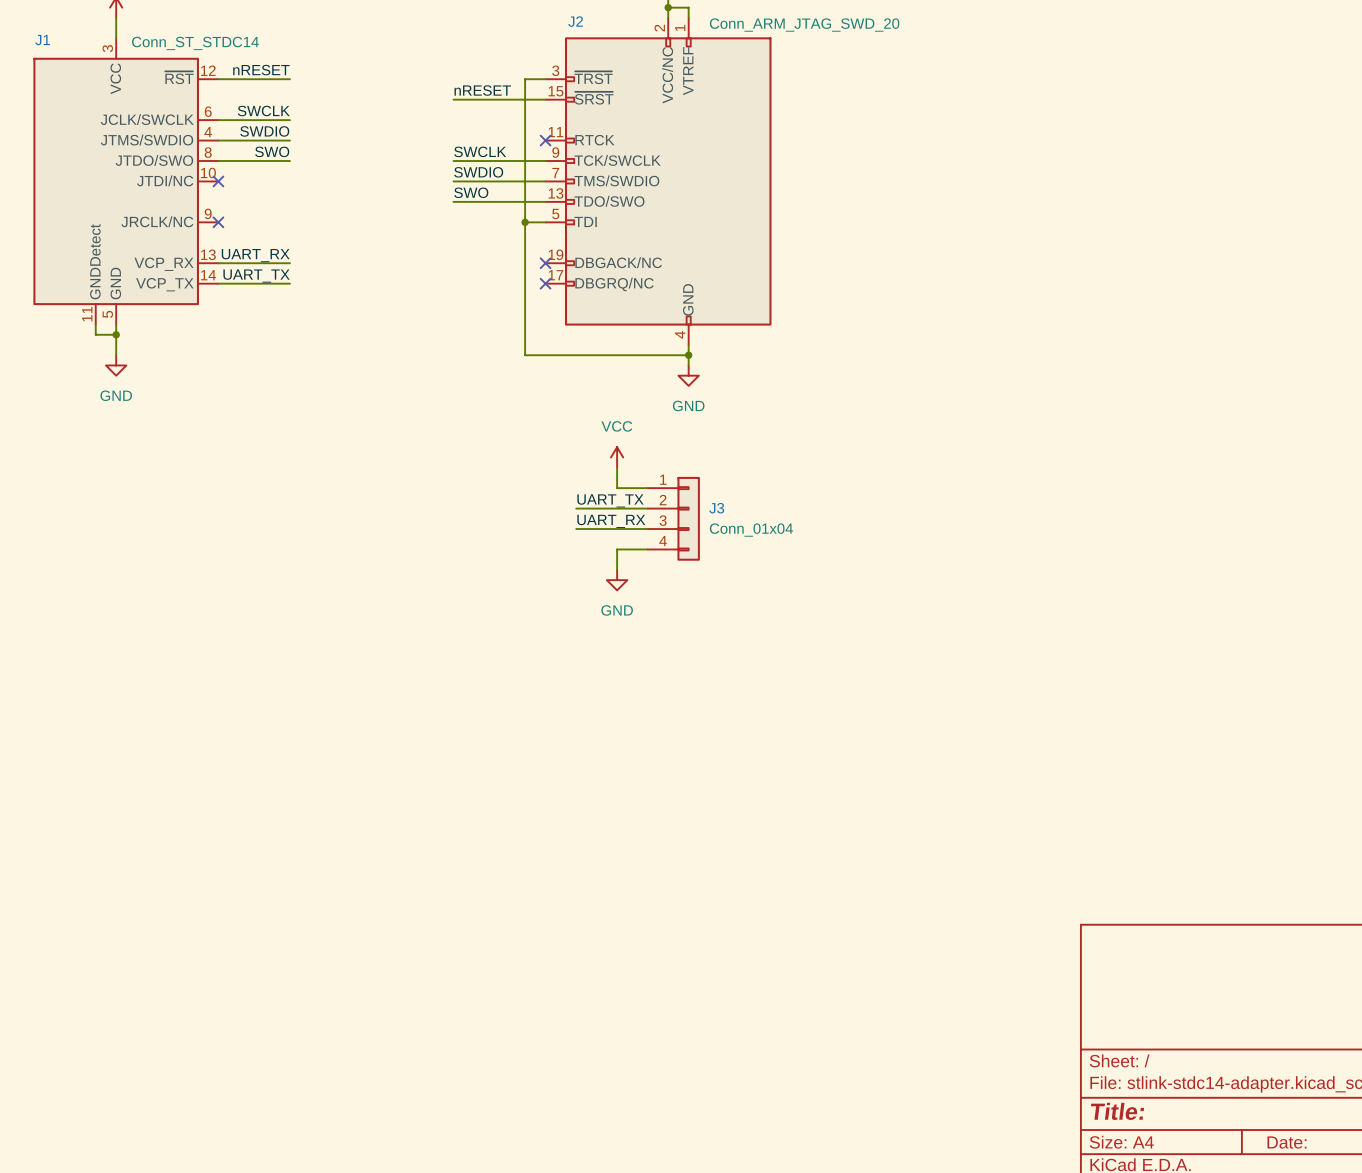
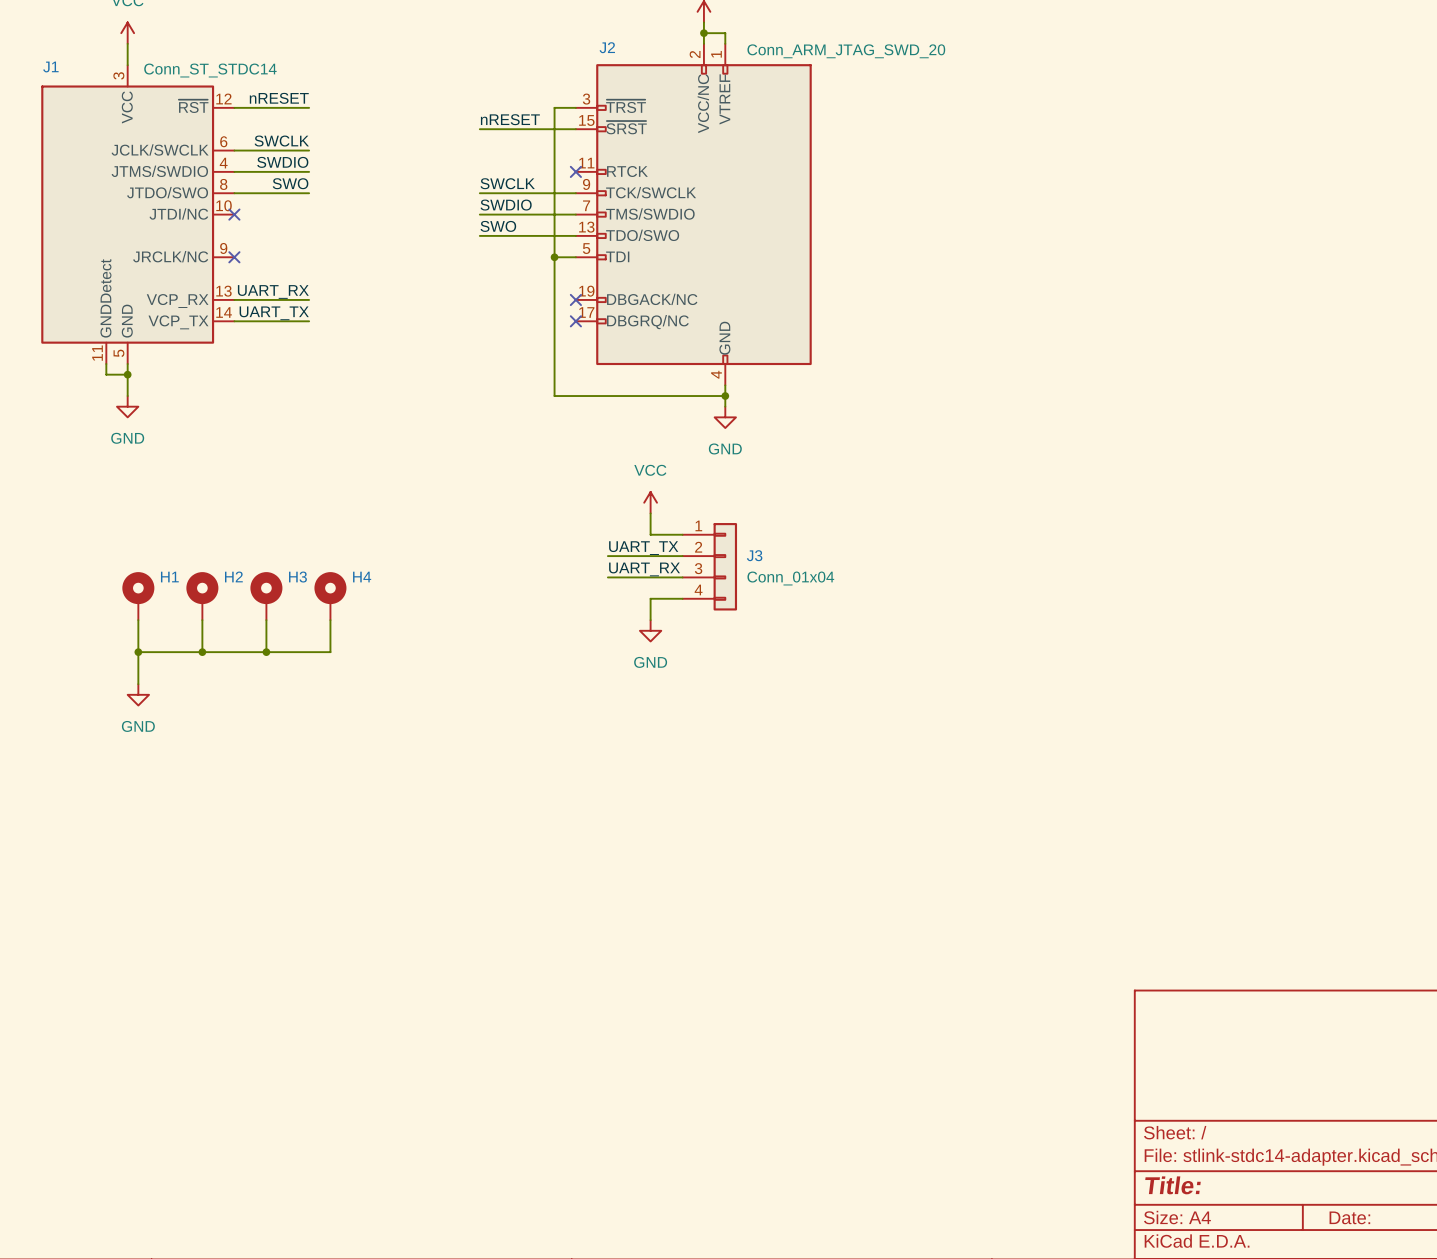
H1: none -> (138, 596)
H2: none -> (202, 596)
H3: none -> (266, 596)
H4: none -> (330, 596)
wire: none -> (138, 620) (138, 684)
wire: none -> (202, 620) (202, 652)
wire: none -> (266, 620) (266, 652)
wire: none -> (330, 620) (330, 652) (138, 652)
junction: none -> (138, 652)
junction: none -> (202, 652)
junction: none -> (266, 652)
power symbol: none -> GND (138, 694)

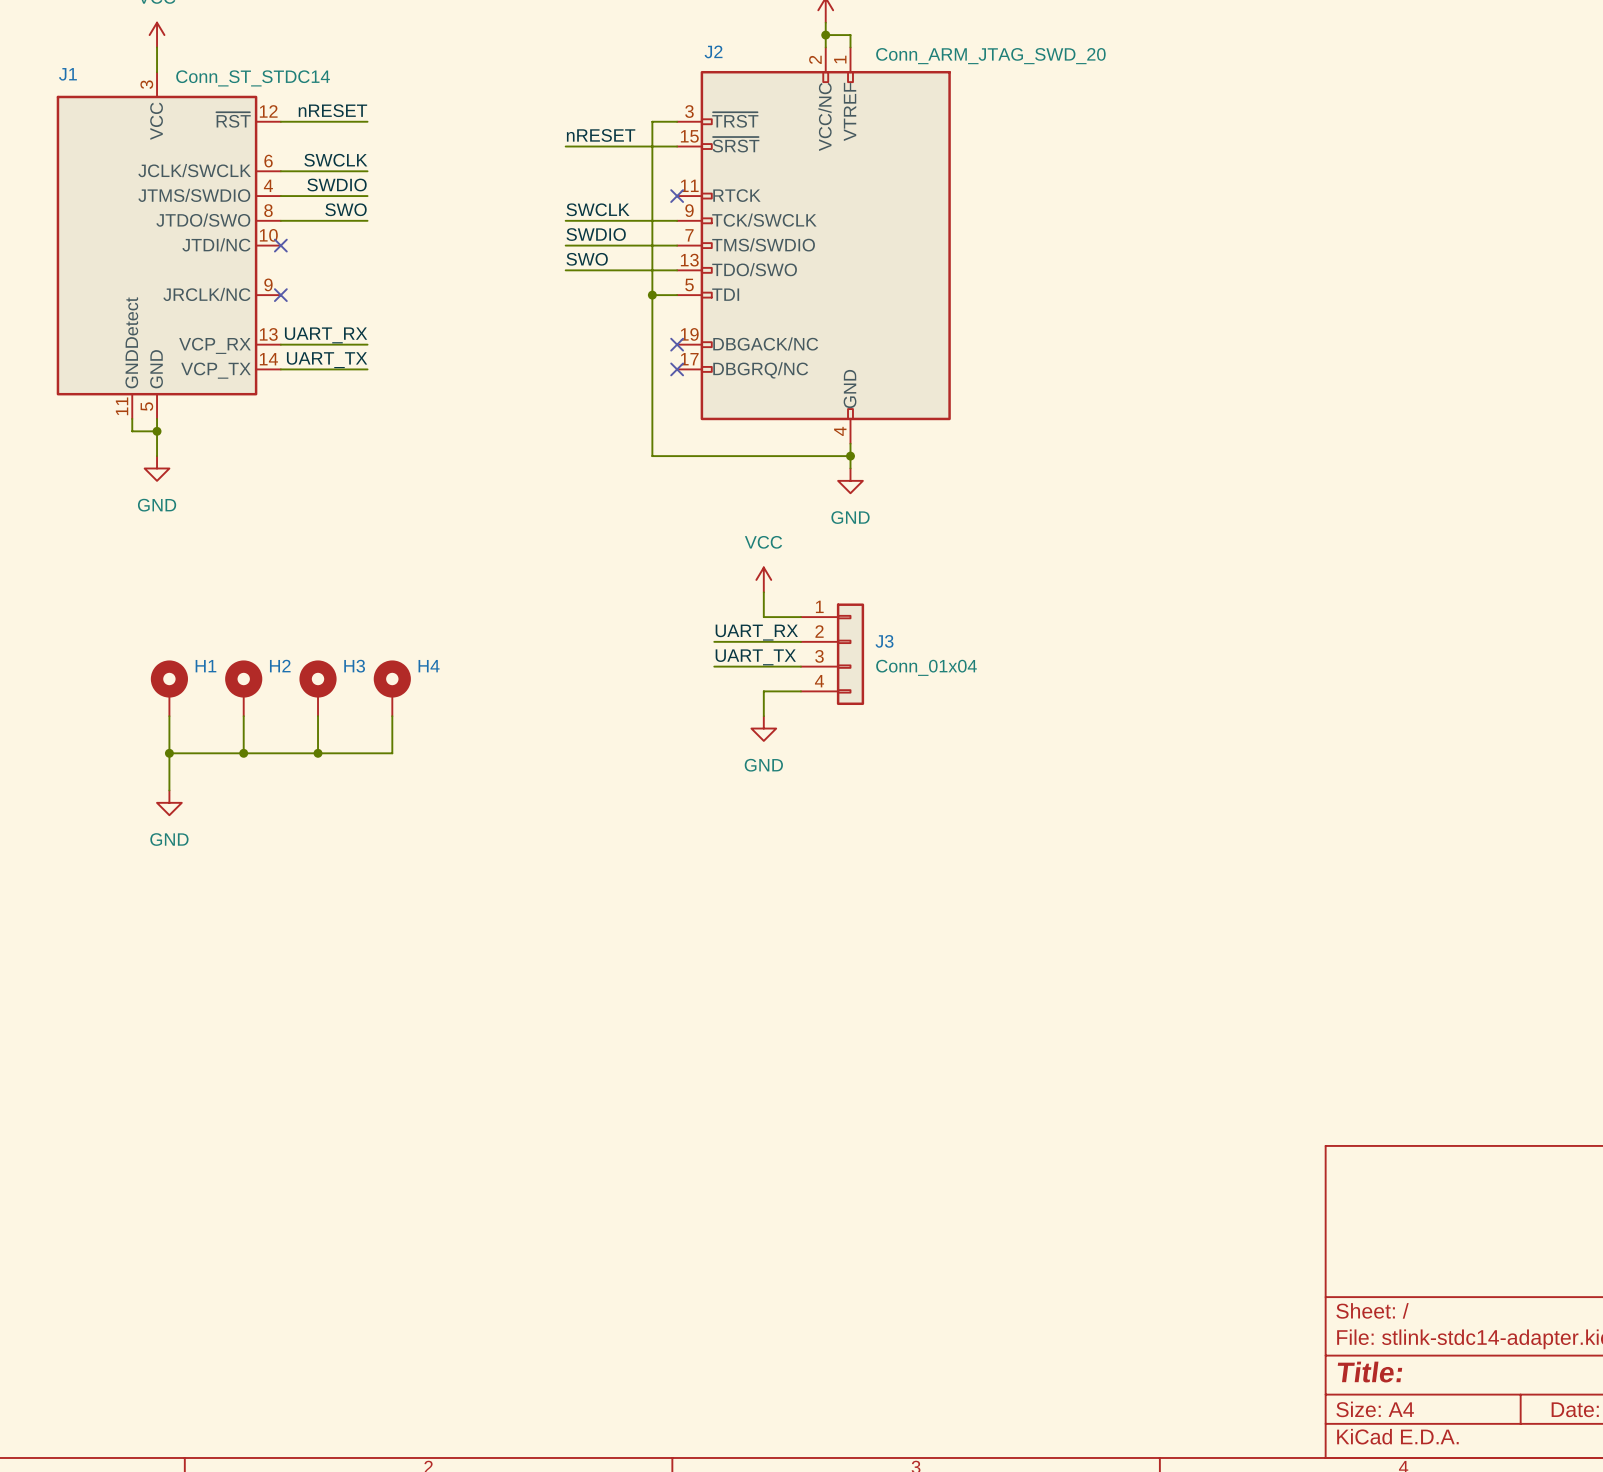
label: UART_TX (643, 548) -> UART_RX (756, 632)
label: UART_RX (644, 569) -> UART_TX (755, 657)

